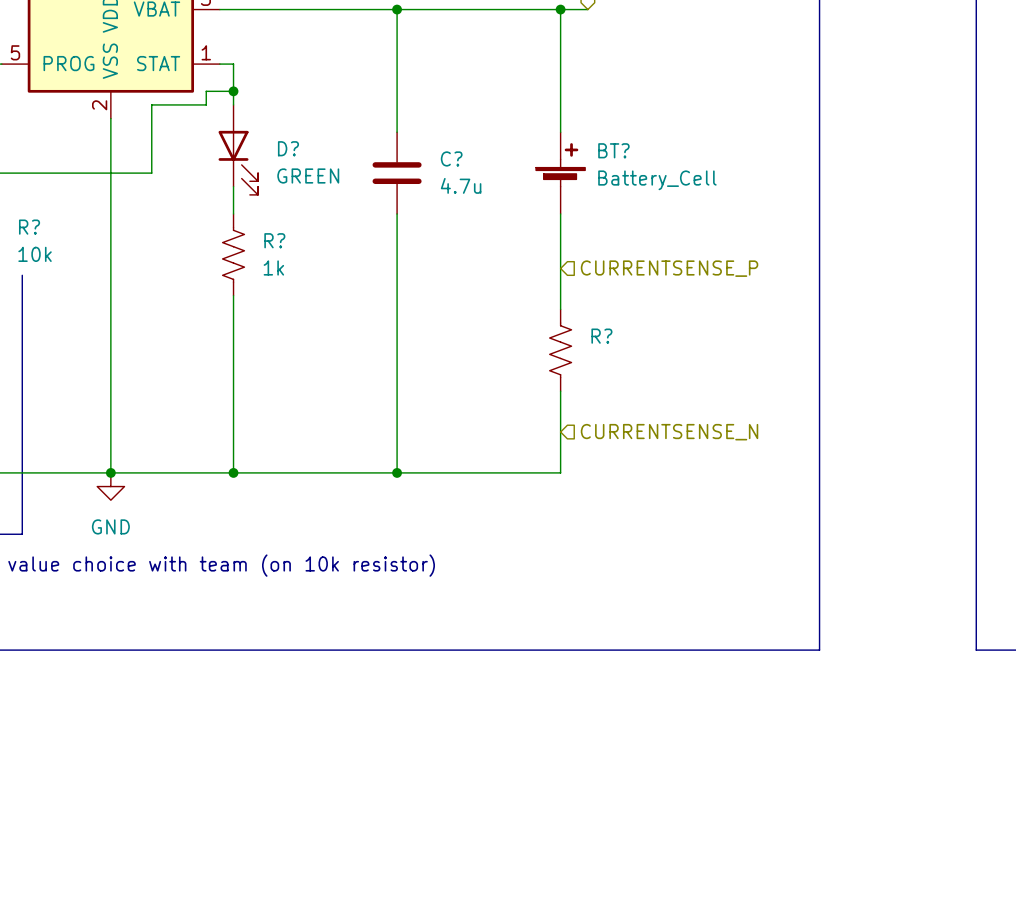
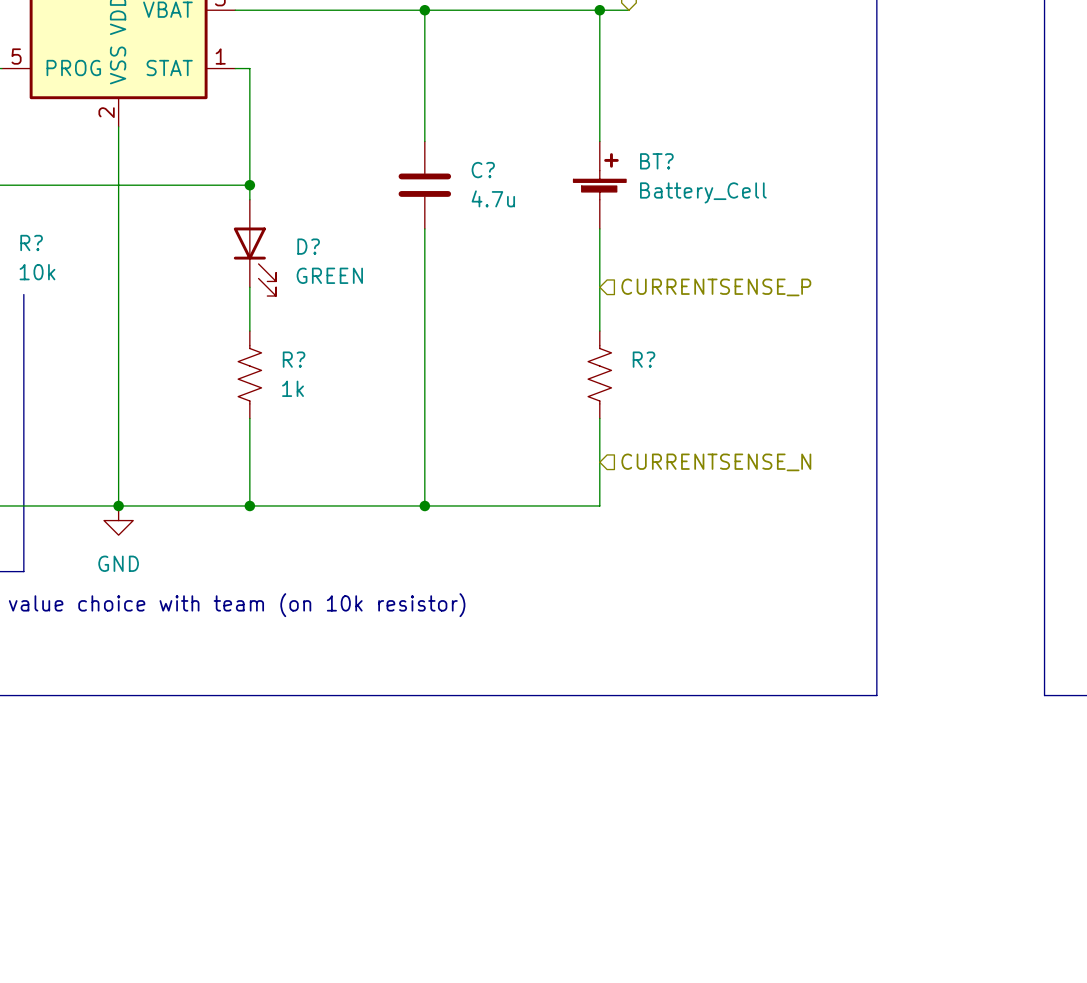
wire: (233, 91) (206, 91) (206, 104) (151, 104) (151, 173) -> (249, 185) (162, 185)
junction: (233, 91) -> none
D? position: (238, 149) -> (254, 247)
junction: none -> (249, 185)
R? position: (233, 254) -> (249, 374)

